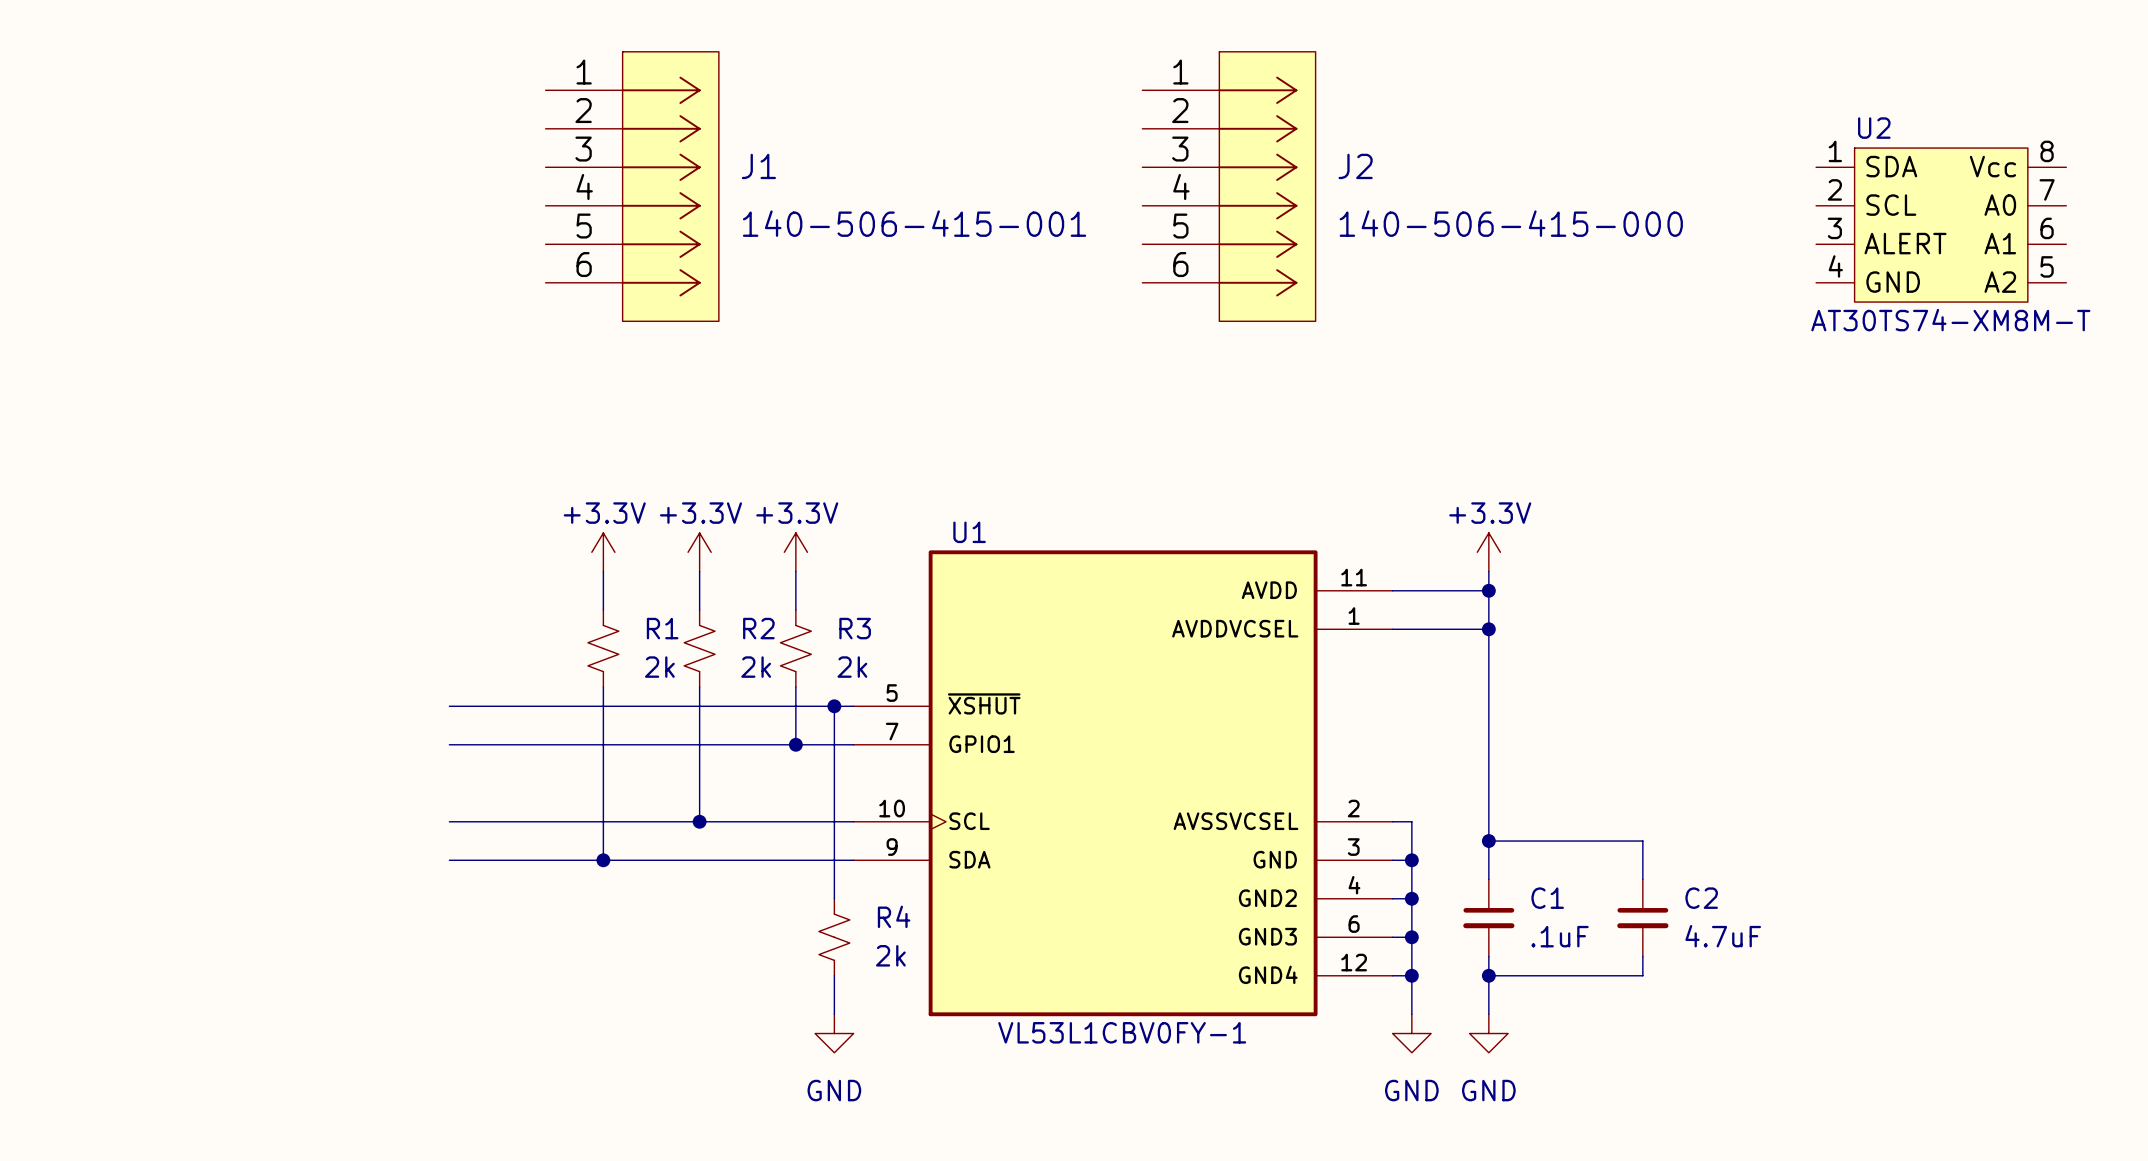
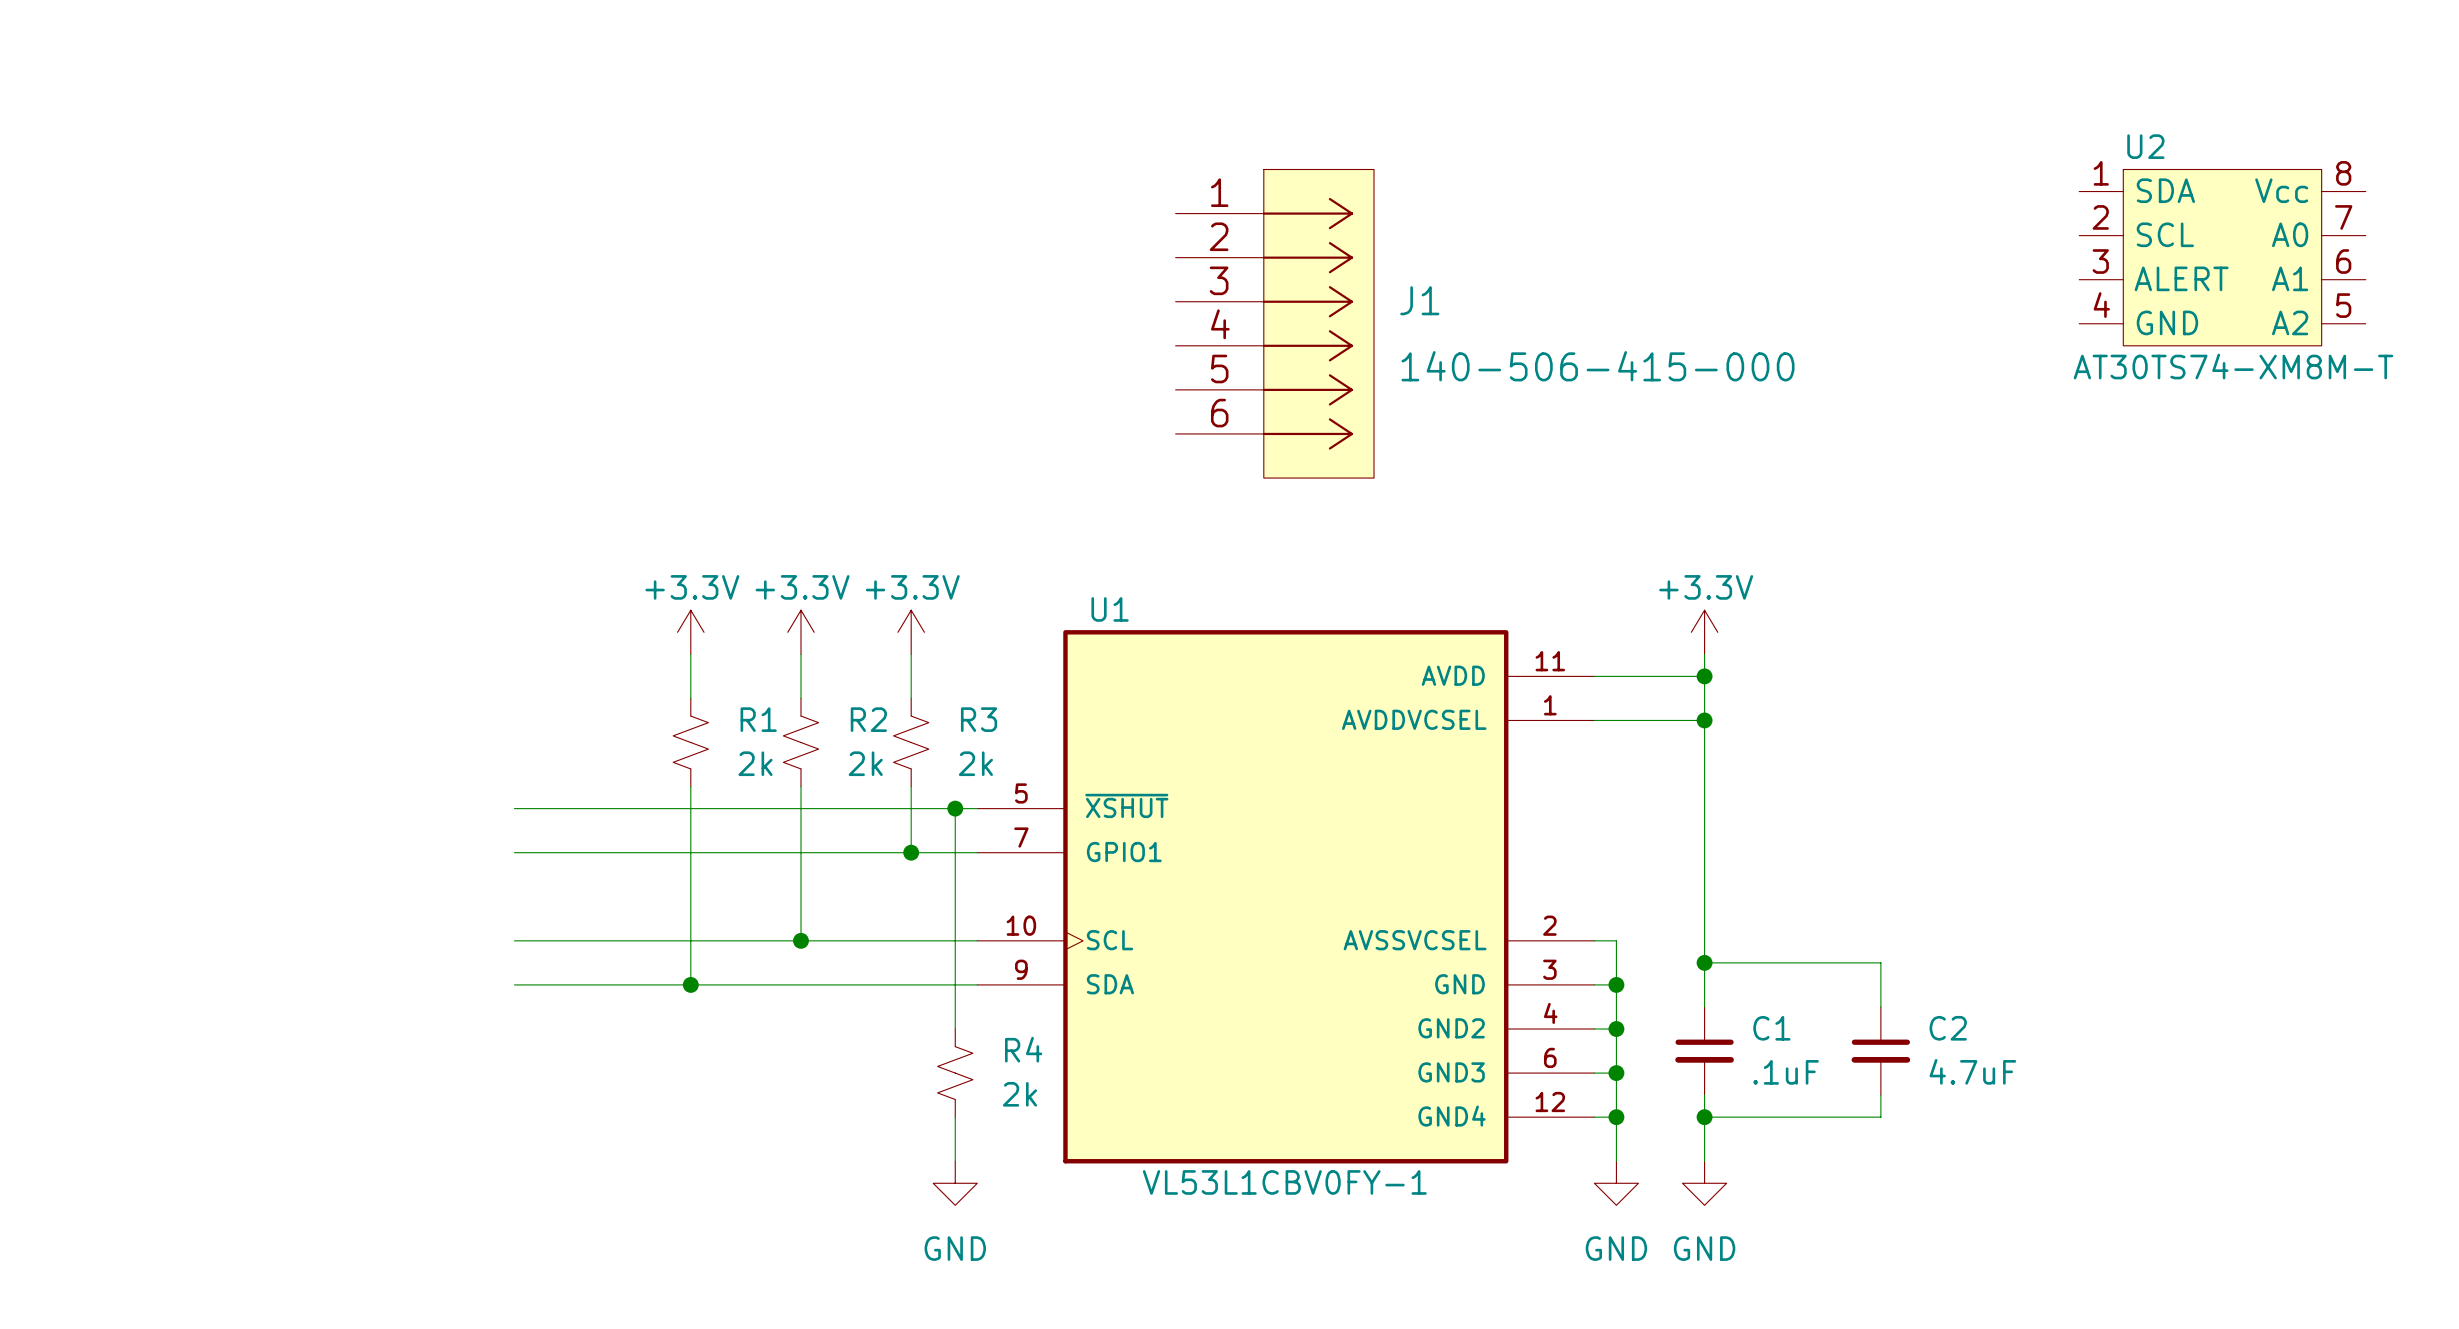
J1 position: (632, 186) -> (1274, 323)
J2: 140-506-415-000 (1228, 186) -> none
J1 value: 140-506-415-001 (914, 223) -> 140-506-415-000 (1598, 366)

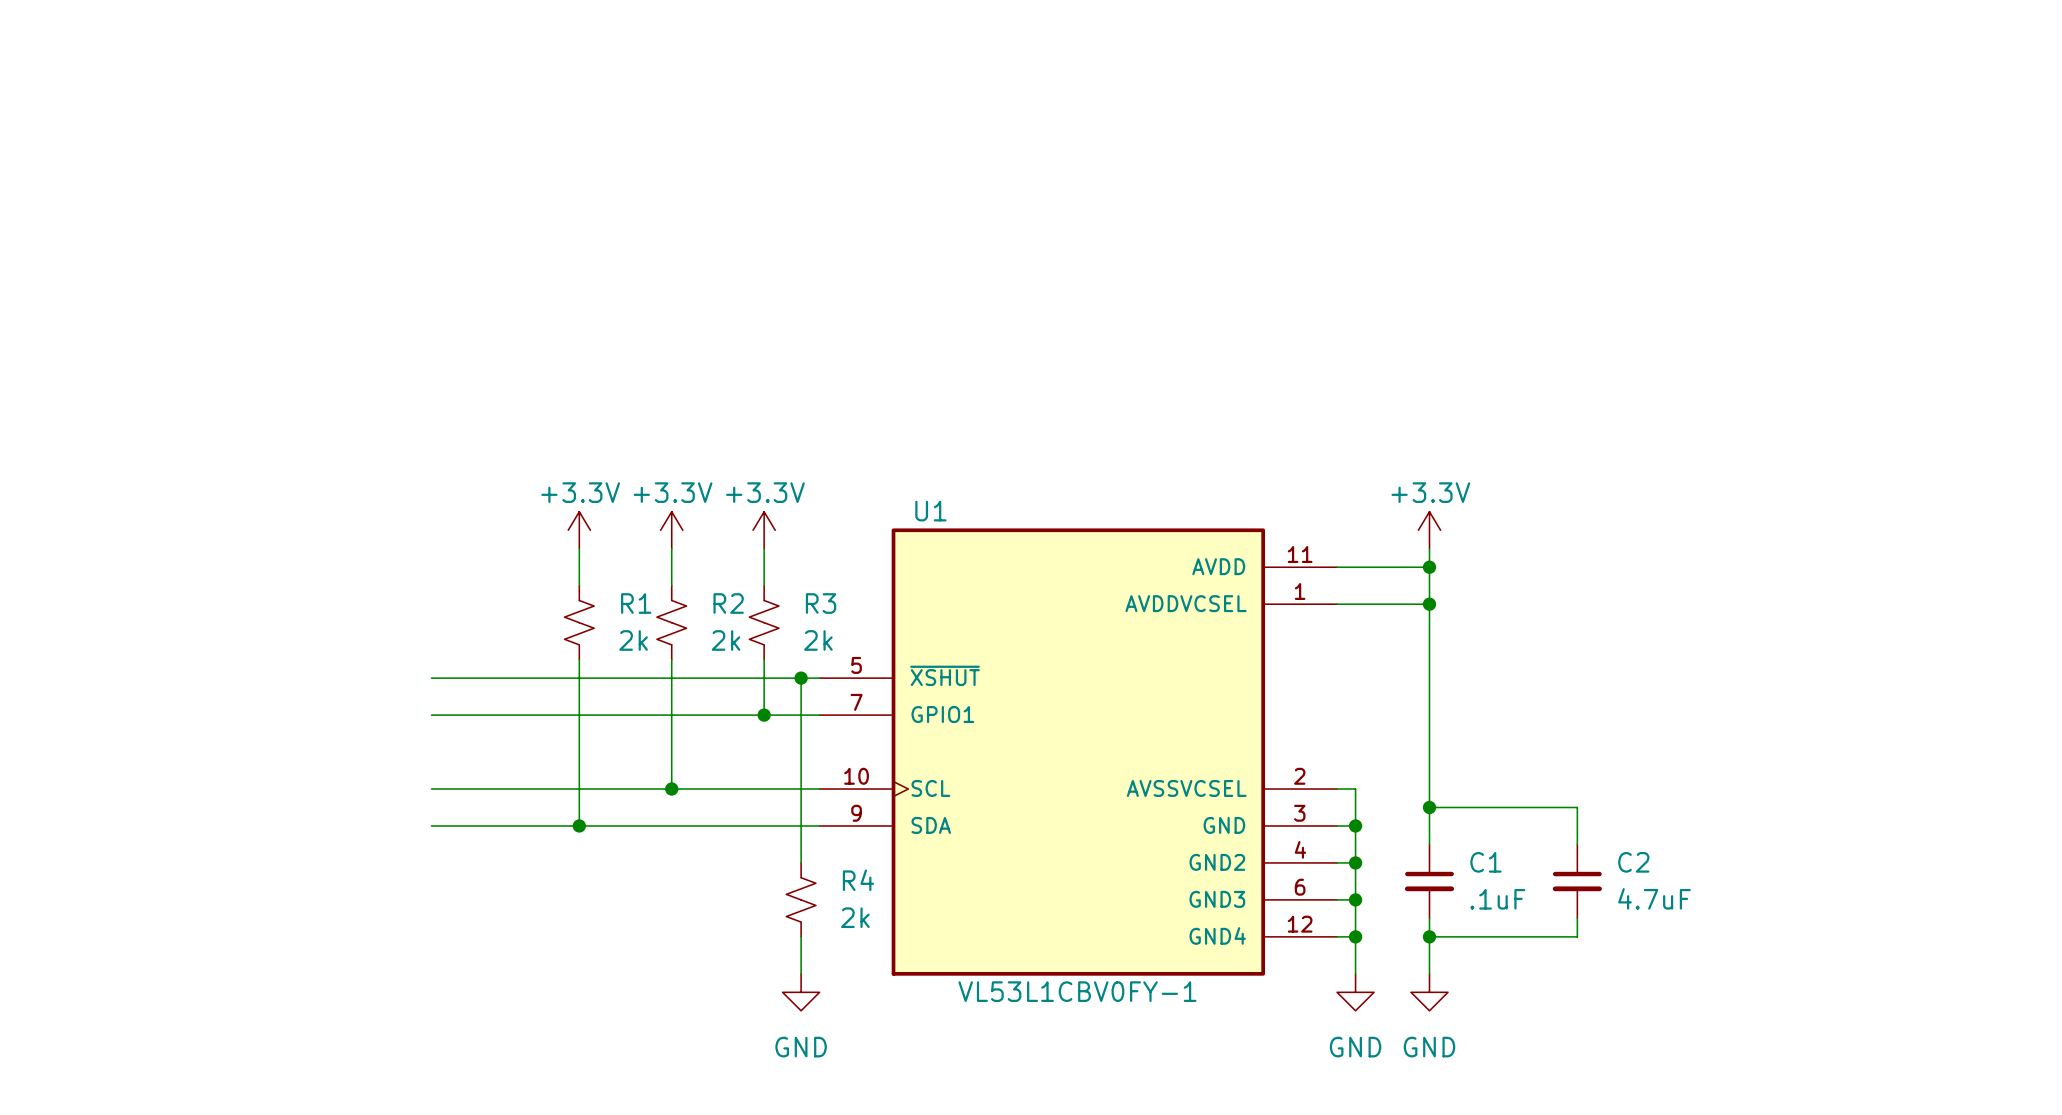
U2: AT30TS74-XM8M-T (2222, 257) -> none
J1: 140-506-415-000 (1274, 323) -> none

